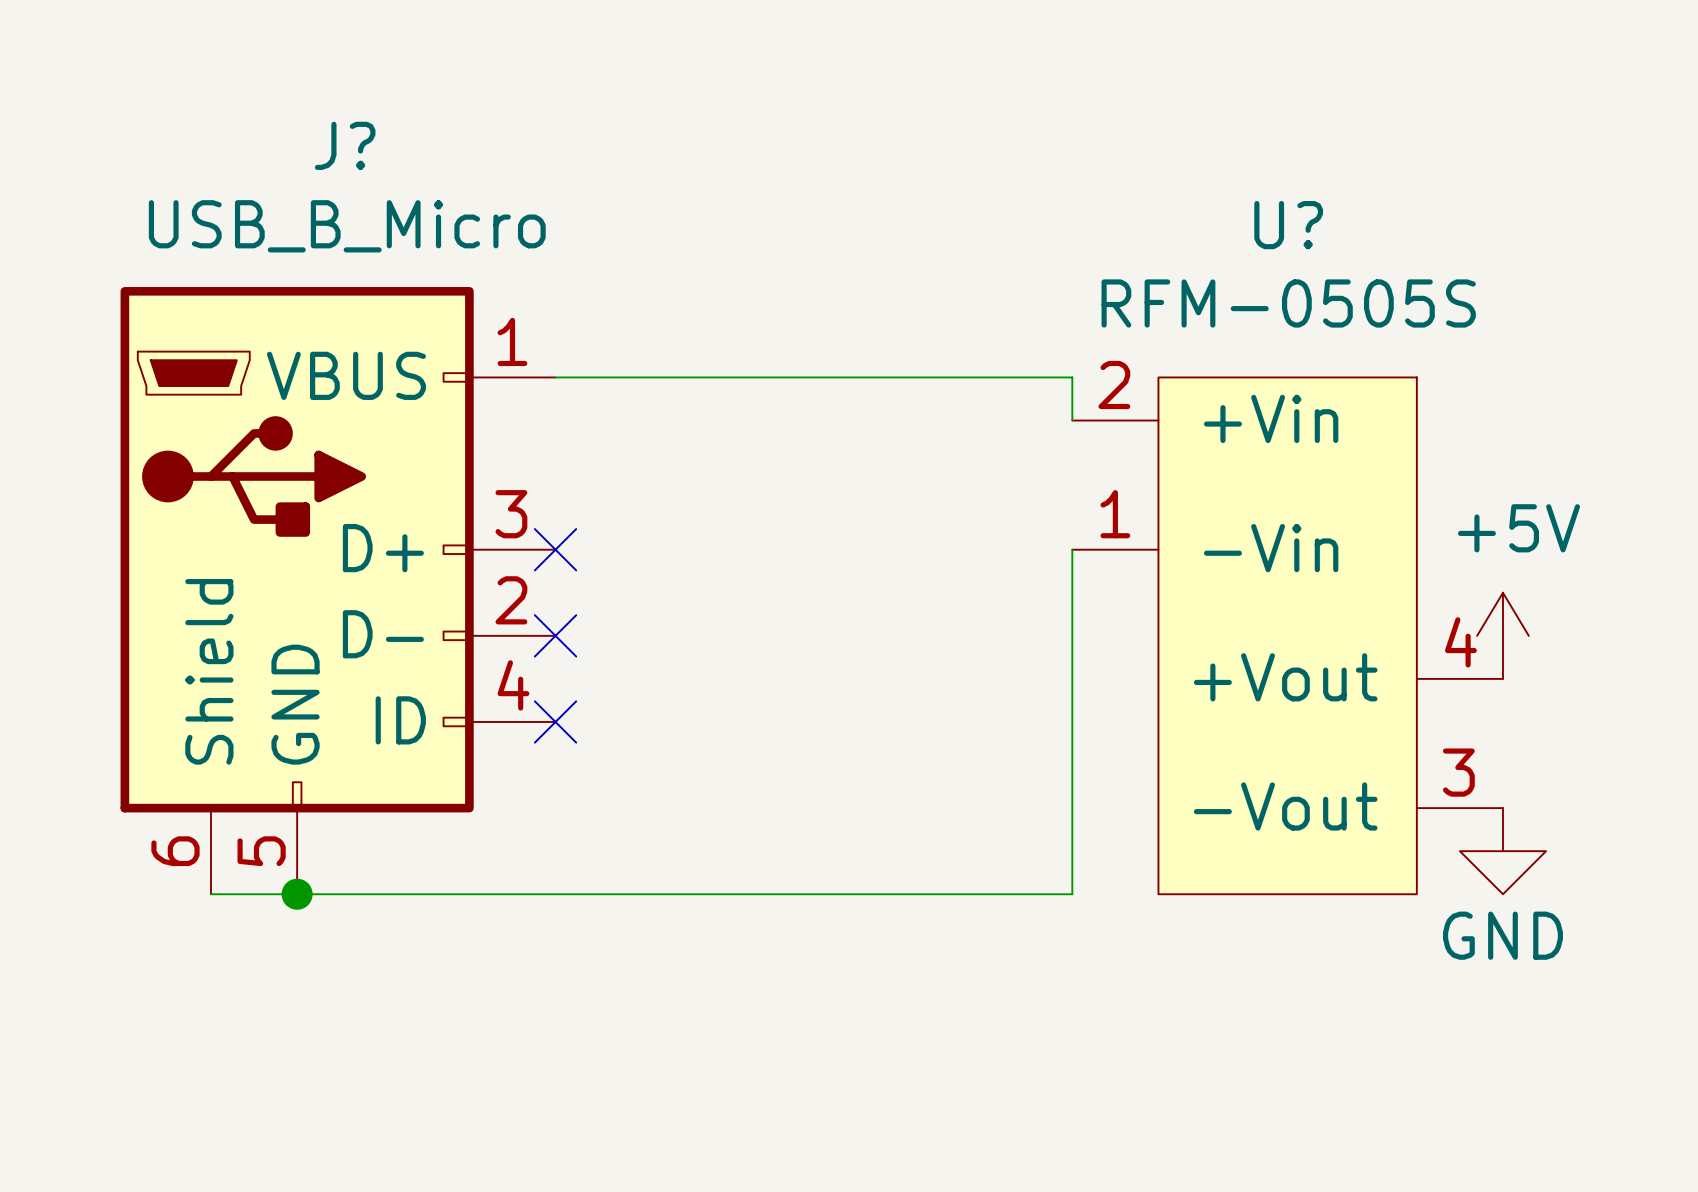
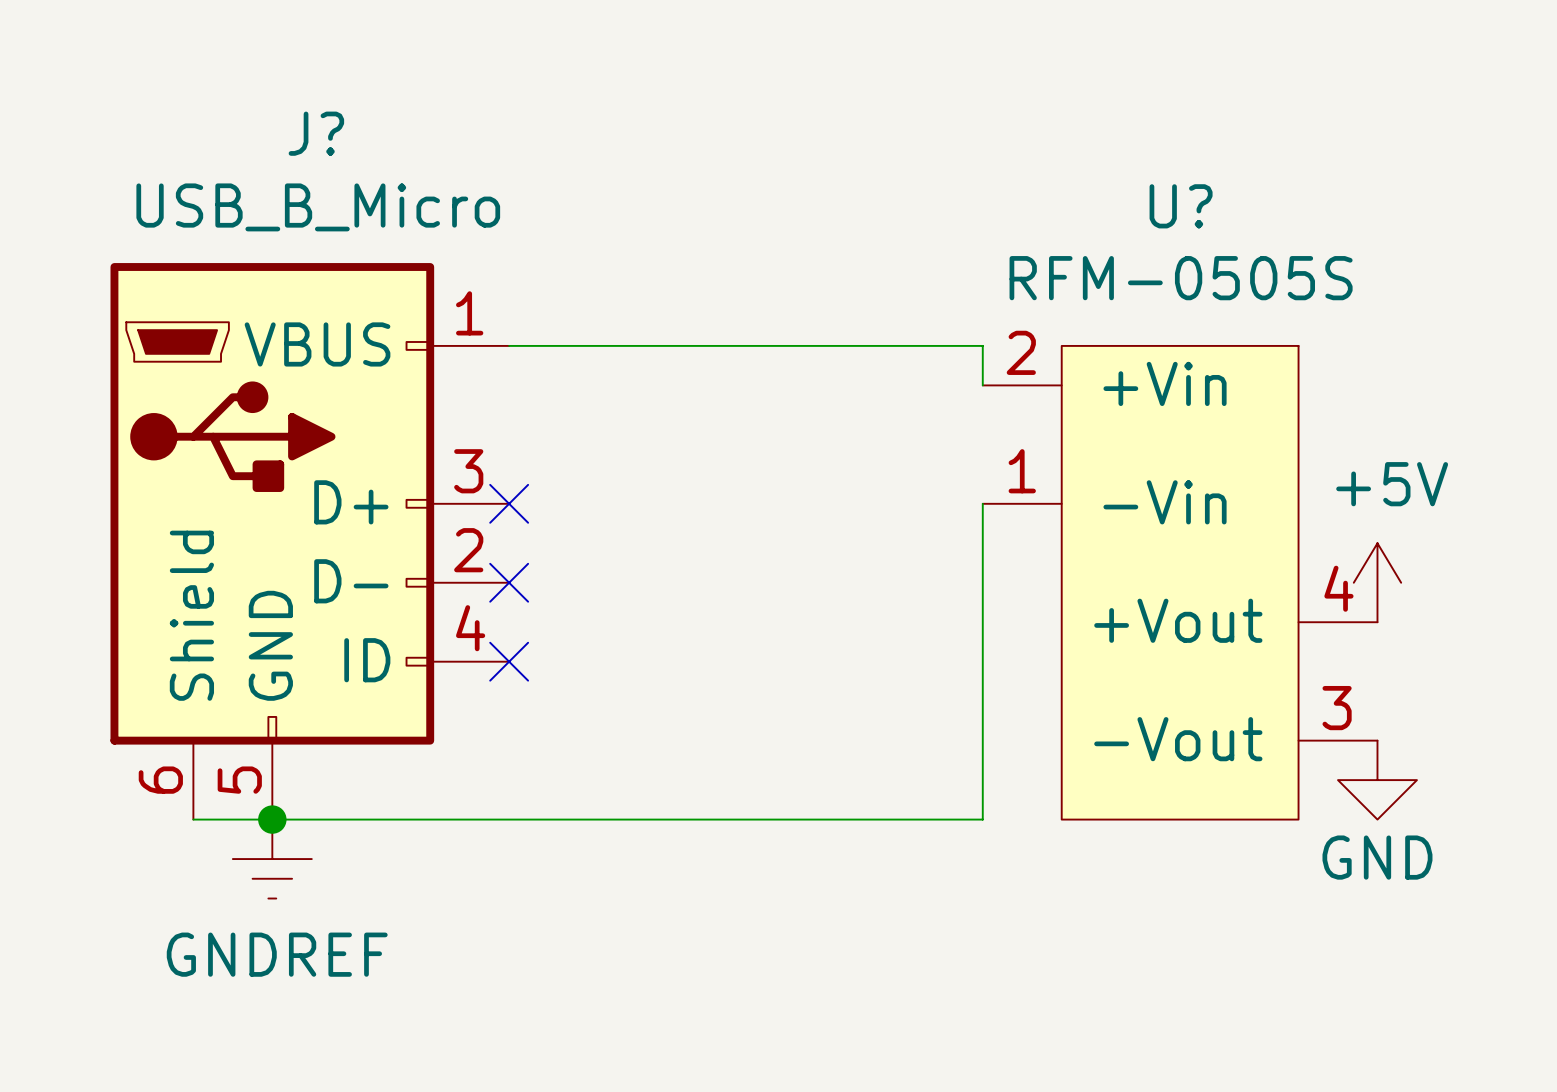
power symbol: none -> GNDREF (272, 859)

